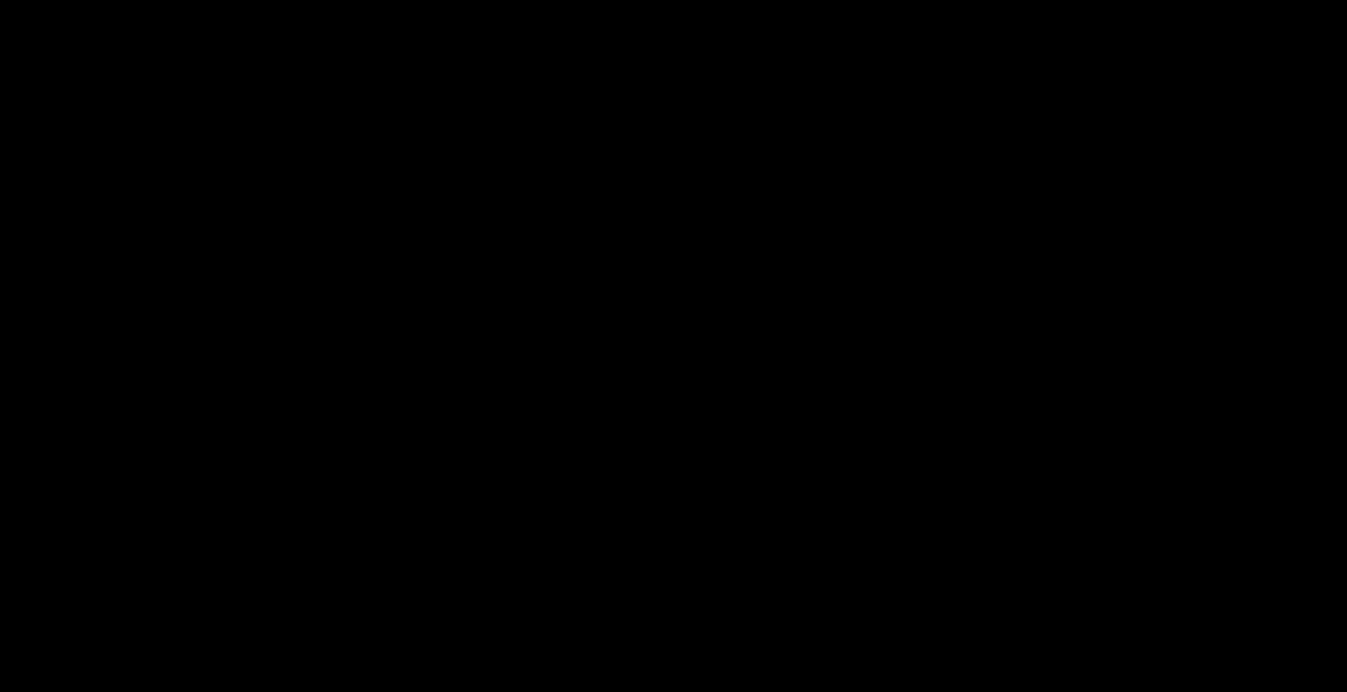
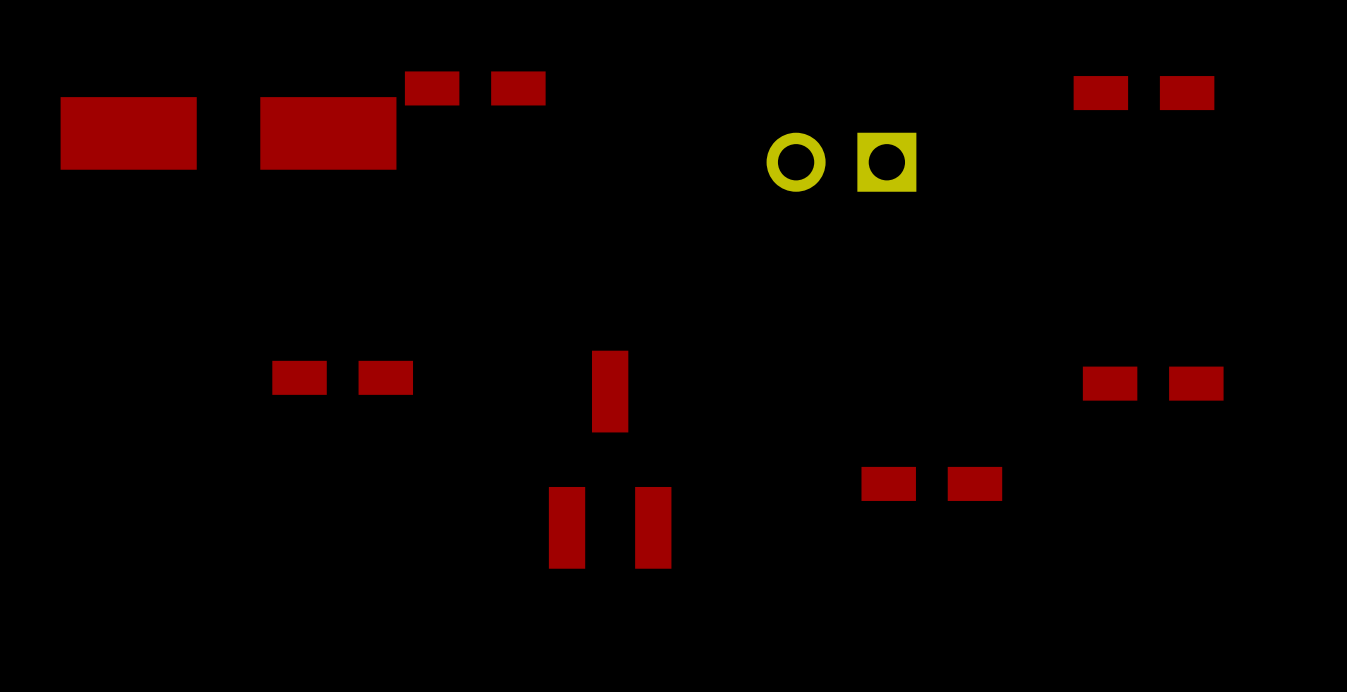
part: none -> (475, 88)
part: none -> (1143, 93)
part: none -> (228, 133)
part: none -> (841, 162)
part: none -> (342, 377)
part: none -> (1153, 383)
part: none -> (610, 459)
part: none -> (931, 483)

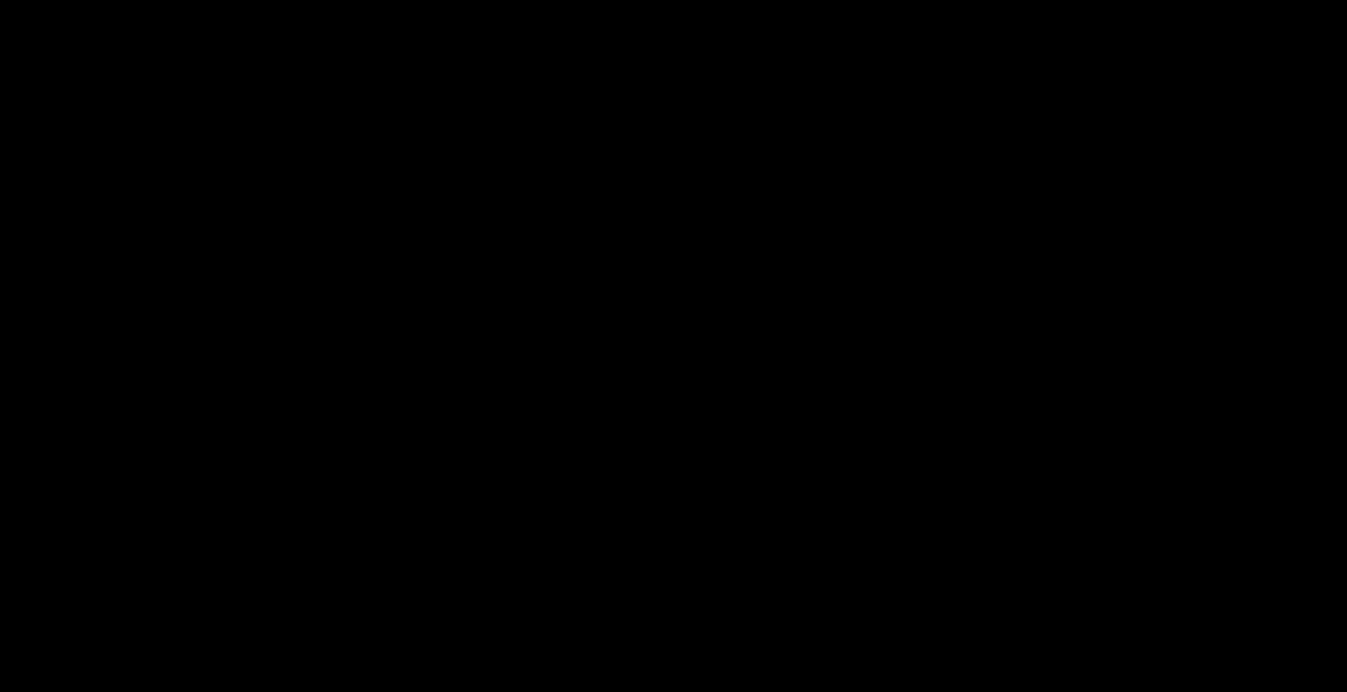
part: (475, 88) -> none
part: (1143, 93) -> none
part: (228, 133) -> none
part: (841, 162) -> none
part: (342, 377) -> none
part: (1153, 383) -> none
part: (610, 459) -> none
part: (931, 483) -> none

